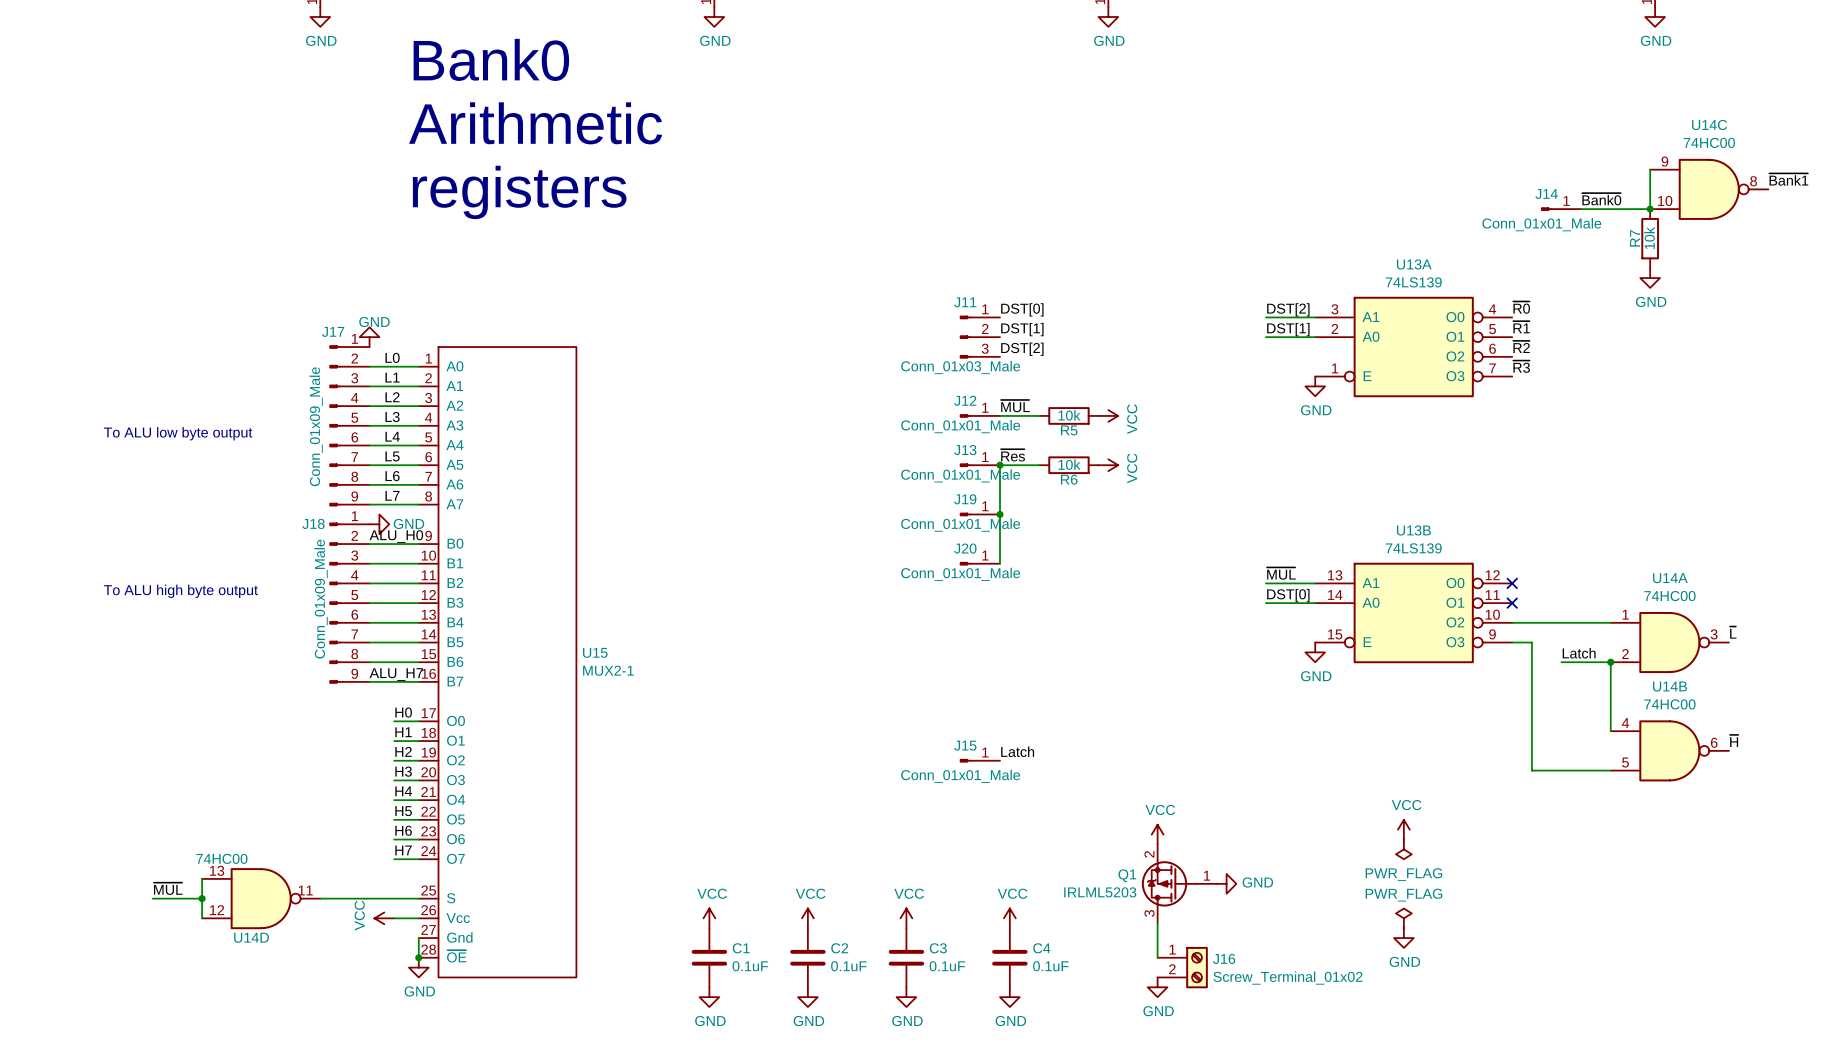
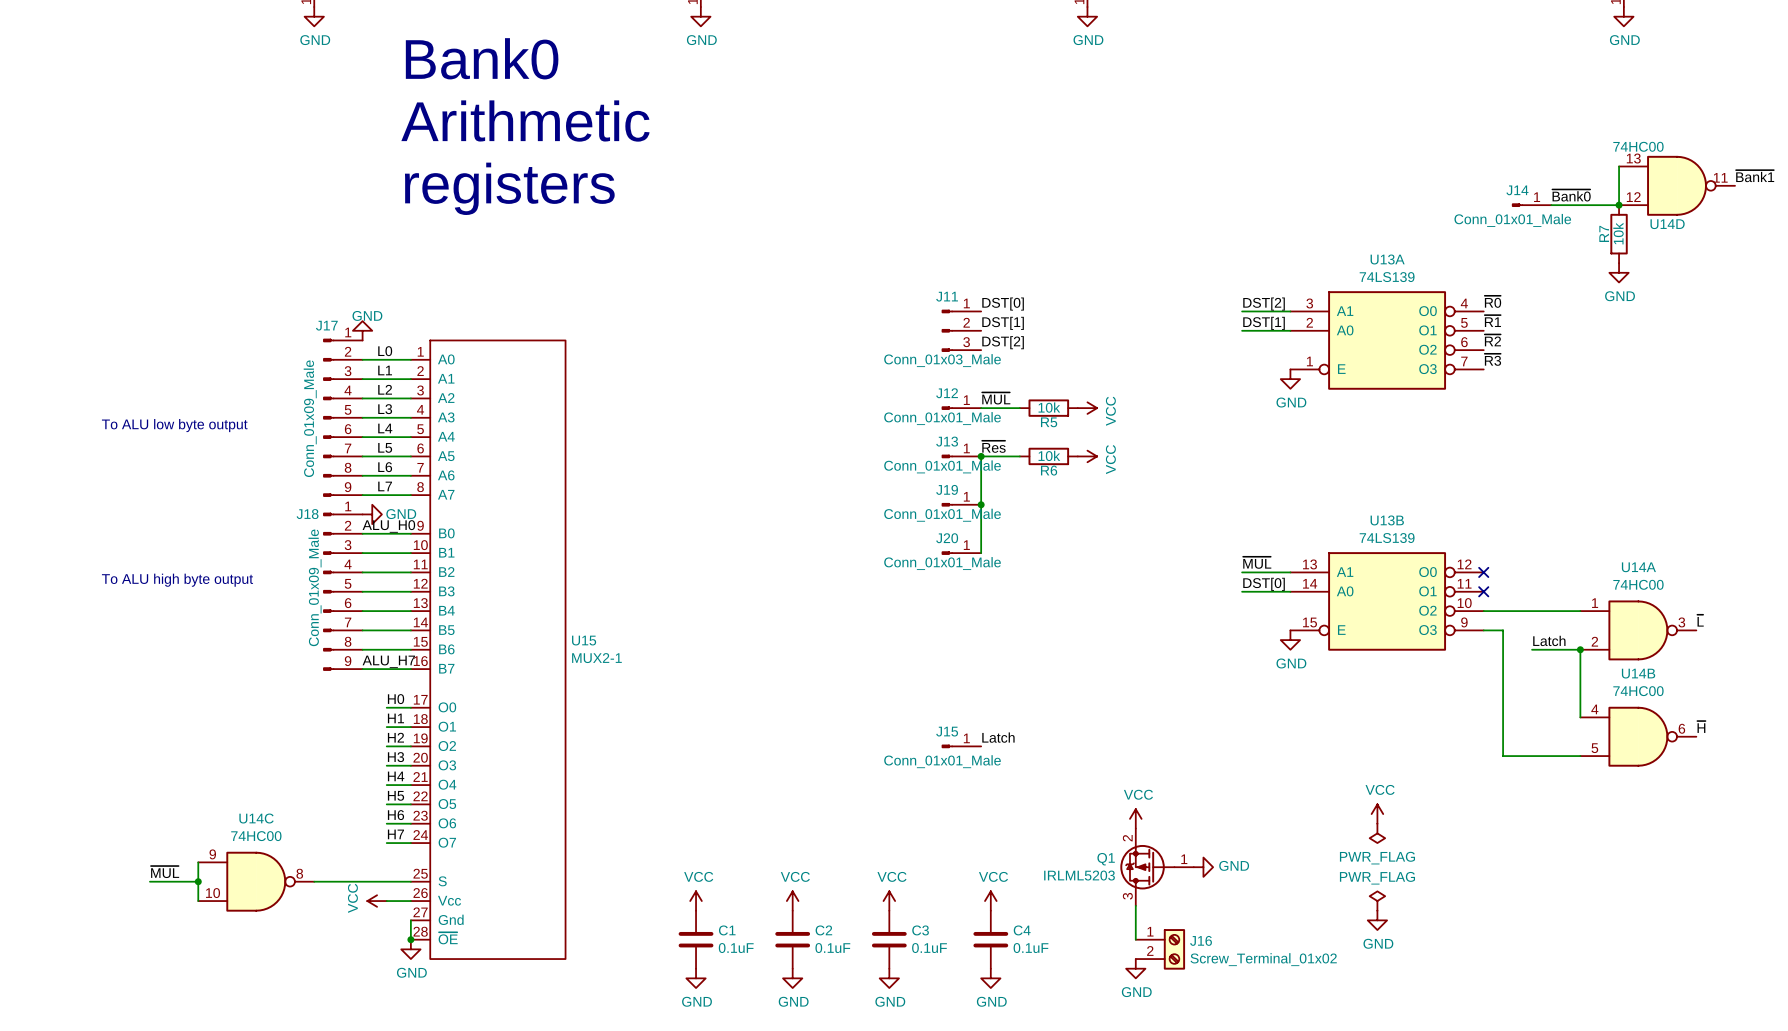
U14C position: (1709, 189) -> (256, 881)
U14D position: (261, 898) -> (1677, 185)

